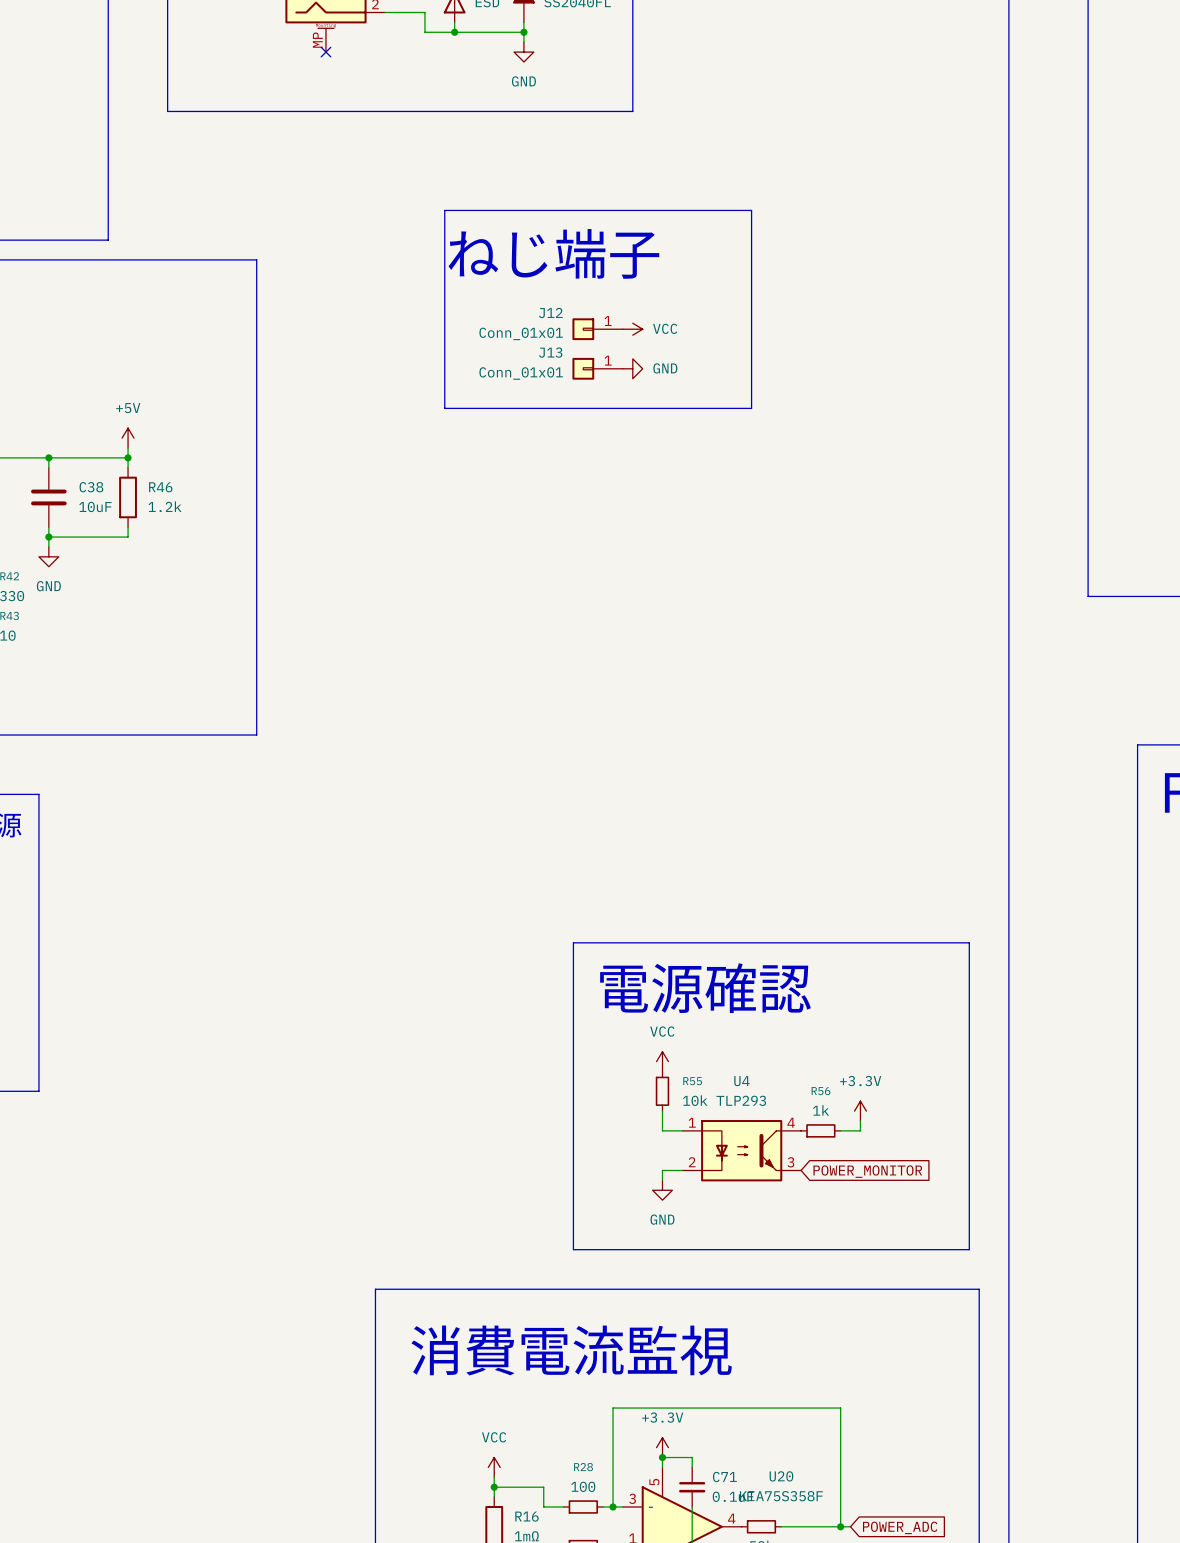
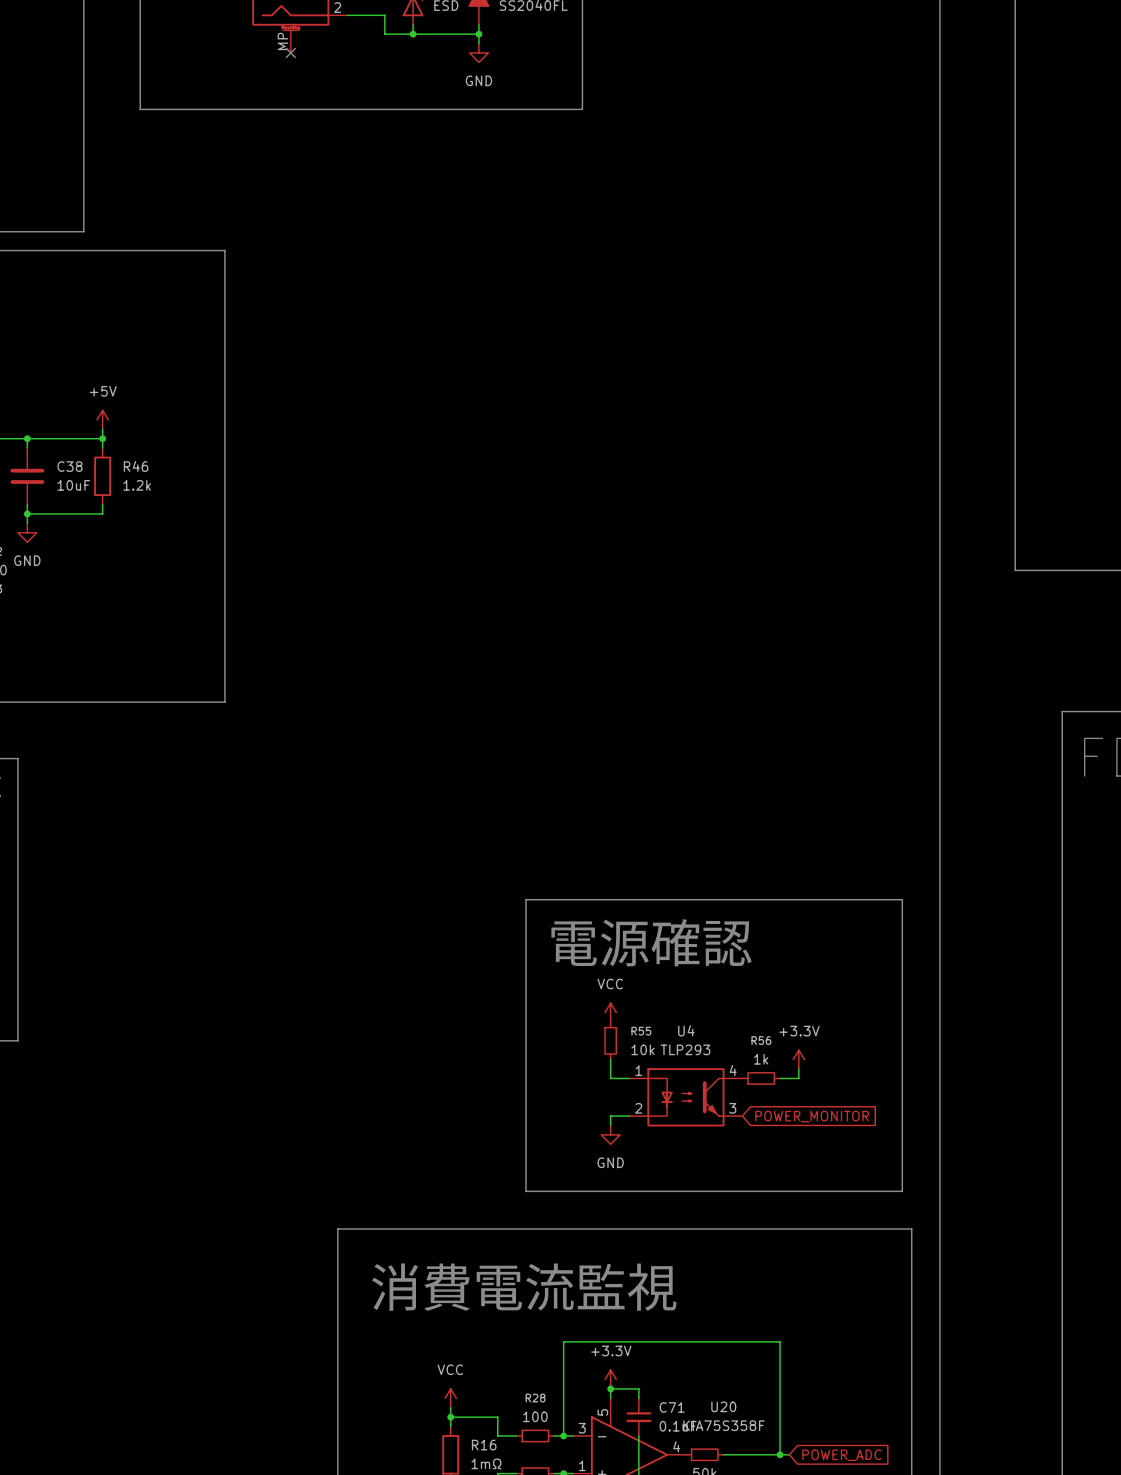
line: (444, 210) (751, 210) (751, 408) (444, 408) (444, 210) -> none
text: ねじ端子 (553, 253) -> none
J12: Conn_01x01 (597, 329) -> none
power symbol: VCC (632, 329) -> none
J13: Conn_01x01 (597, 368) -> none
power symbol: GND (632, 368) -> none

